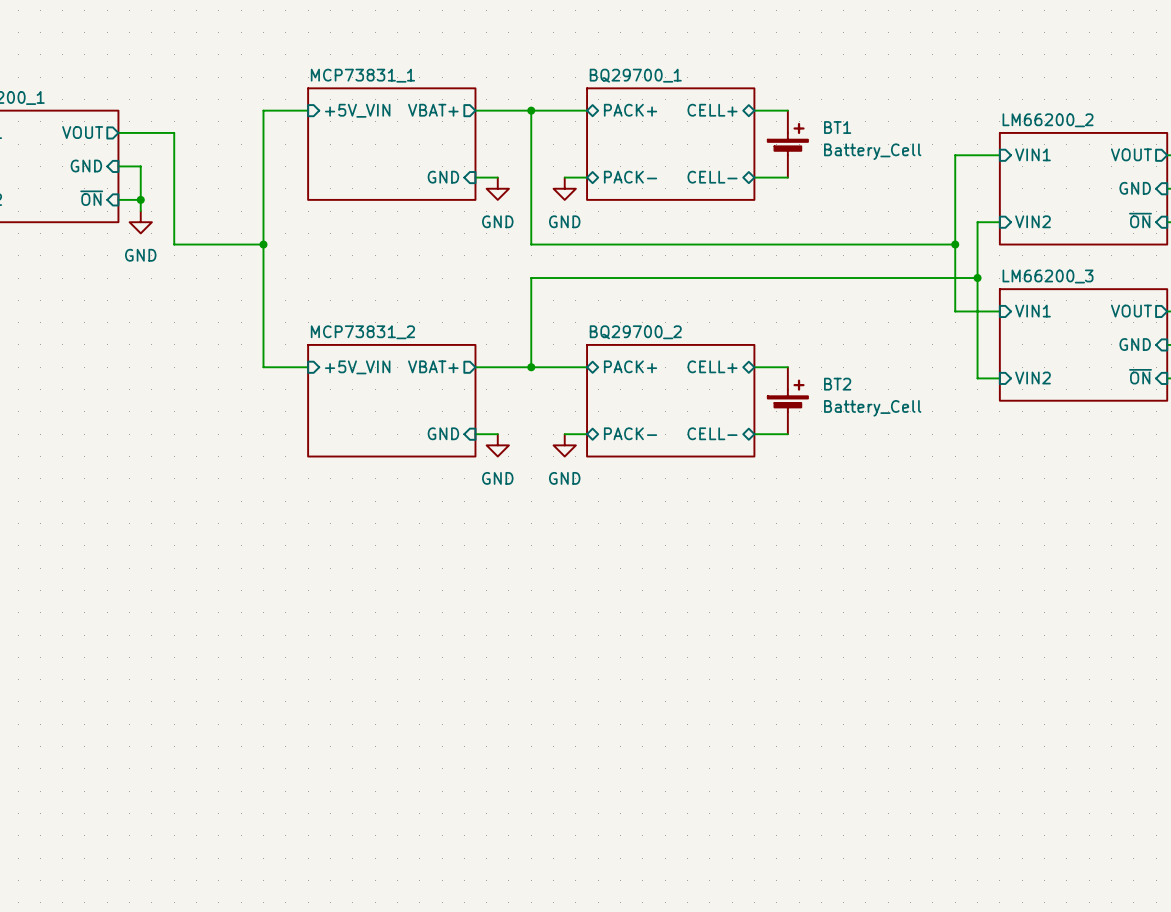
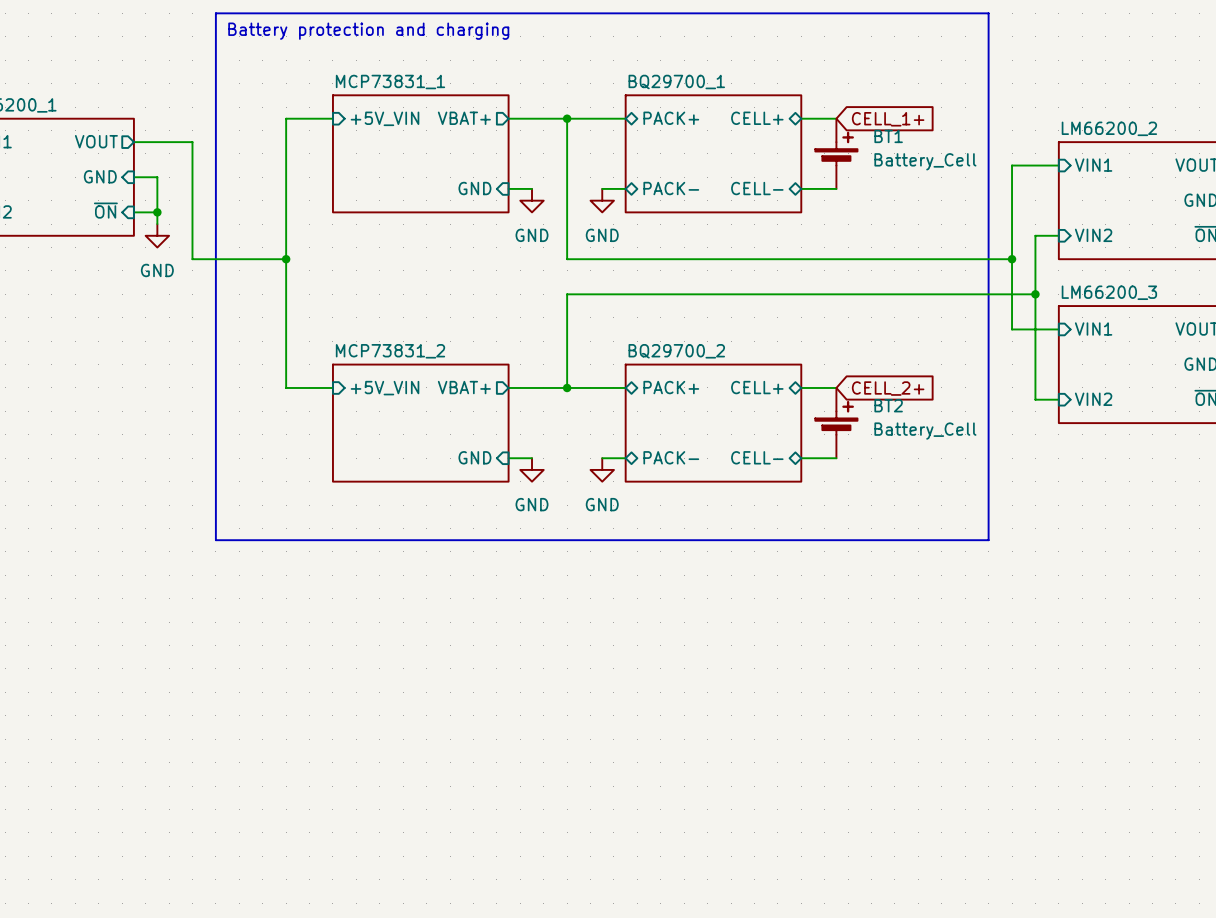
line: none -> (215, 13) (988, 13) (988, 540) (215, 540) (215, 13)
text: none -> Battery protection and charging (368, 31)
global label: none -> CELL_1+ (888, 119)
global label: none -> CELL_2+ (888, 388)

